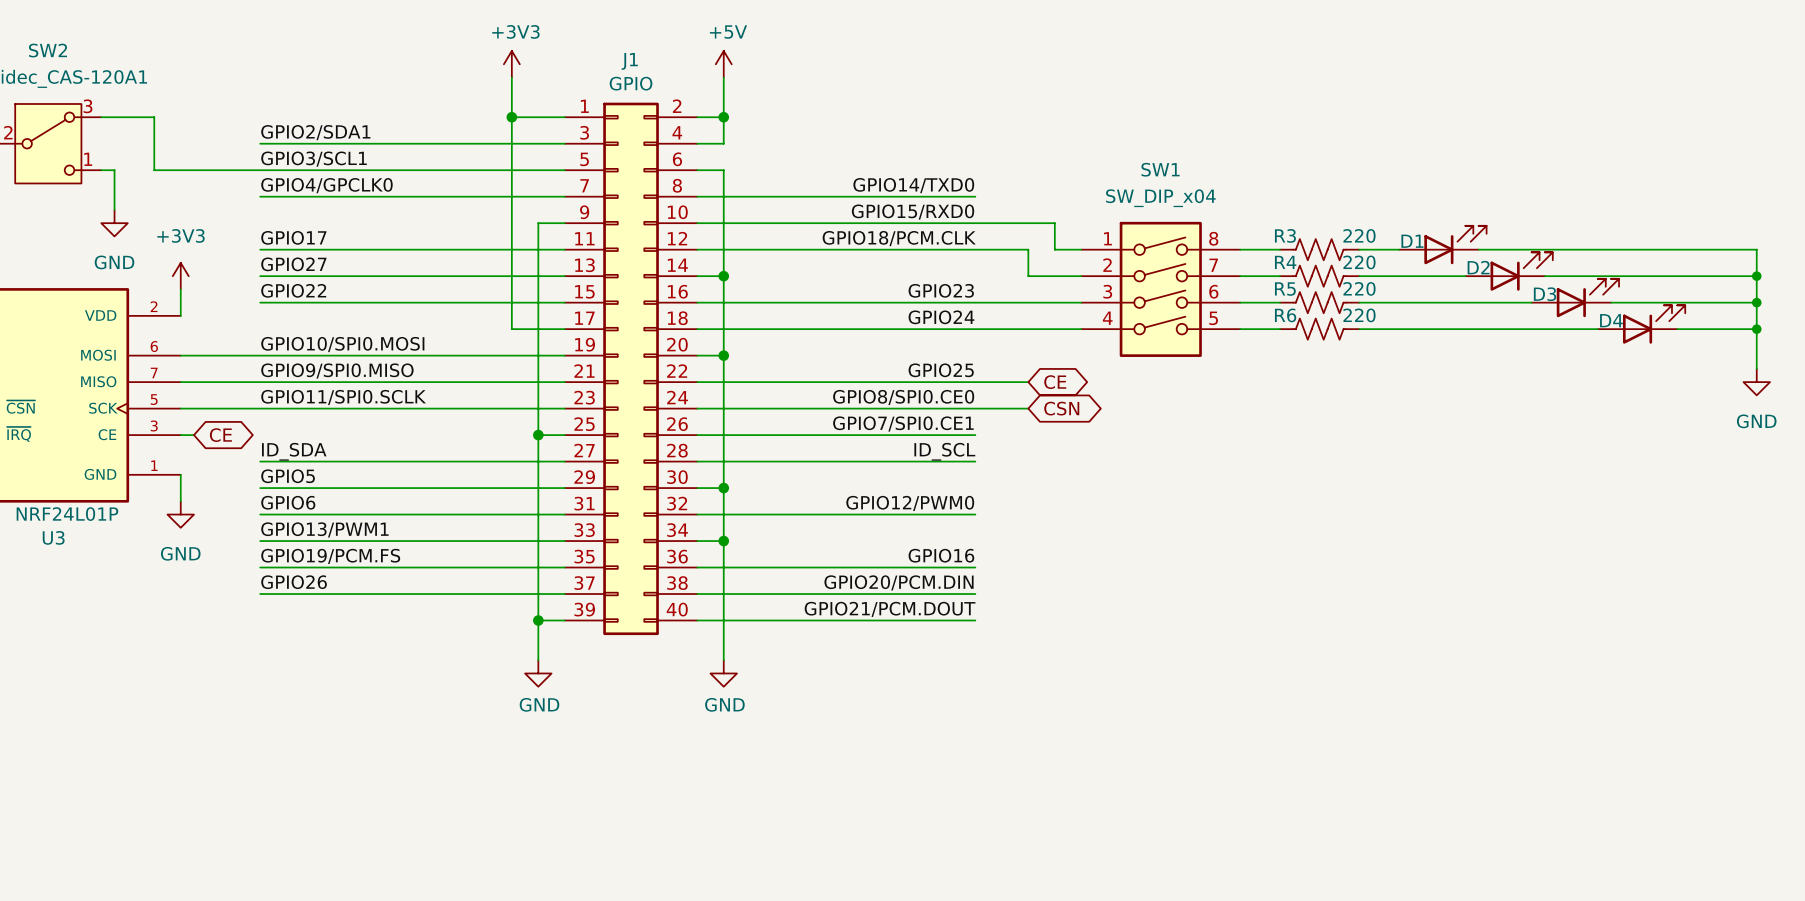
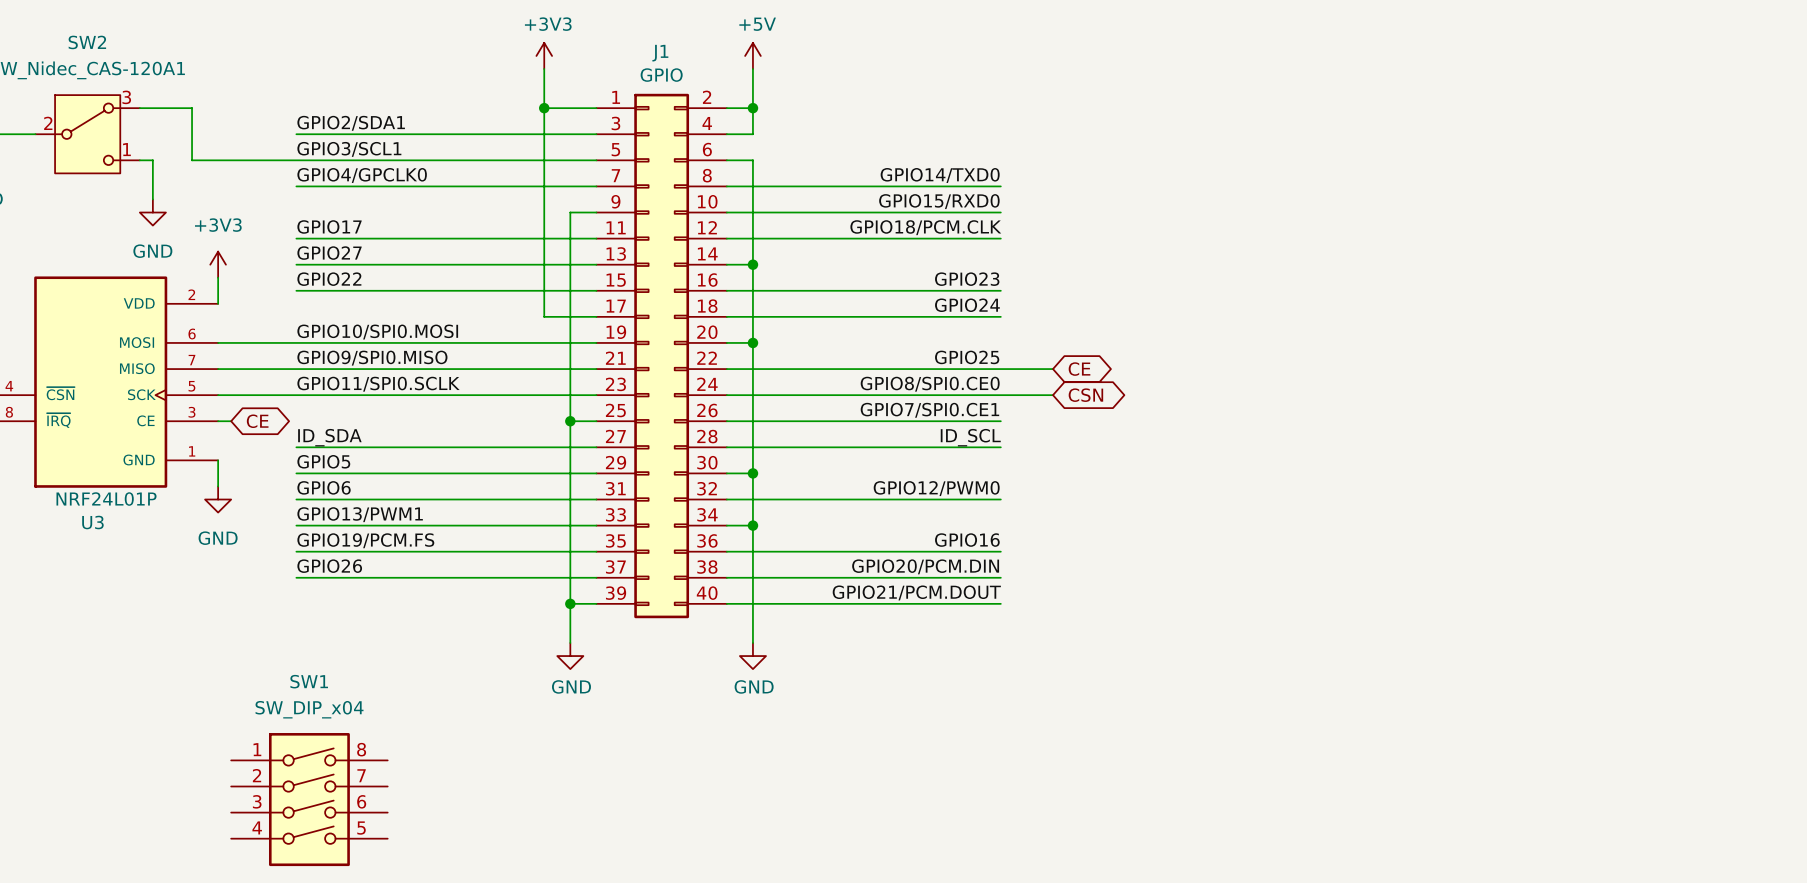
wire: (975, 223) (1054, 223) (1054, 249) (1081, 249) -> none
D1: (1442, 245) -> none
wire: (975, 249) (1028, 249) (1028, 276) (1081, 276) -> none
wire: (1240, 249) (1279, 249) -> none
R3: 220 (1319, 249) -> none
wire: (1359, 249) (1399, 249) -> none
wire: (1478, 249) (1756, 249) (1756, 368) -> none
D2: (1509, 271) -> none
wire: (1240, 276) (1279, 276) -> none
R4: 220 (1319, 276) -> none
wire: (1359, 276) (1465, 276) -> none
wire: (1544, 276) (1756, 276) -> none
junction: (1756, 276) -> none
SW1 position: (1160, 289) -> (309, 799)
D3: (1575, 298) -> none
wire: (975, 302) (1081, 302) -> none
wire: (1240, 302) (1279, 302) -> none
R5: 220 (1319, 302) -> none
wire: (1359, 302) (1531, 302) -> none
wire: (1611, 302) (1756, 302) -> none
junction: (1756, 302) -> none
D4: (1641, 324) -> none
wire: (975, 329) (1081, 329) -> none
wire: (1240, 329) (1279, 329) -> none
R6: 220 (1319, 329) -> none
wire: (1359, 329) (1597, 329) -> none
wire: (1677, 329) (1756, 329) -> none
junction: (1756, 329) -> none
power symbol: GND (1756, 382) -> none

